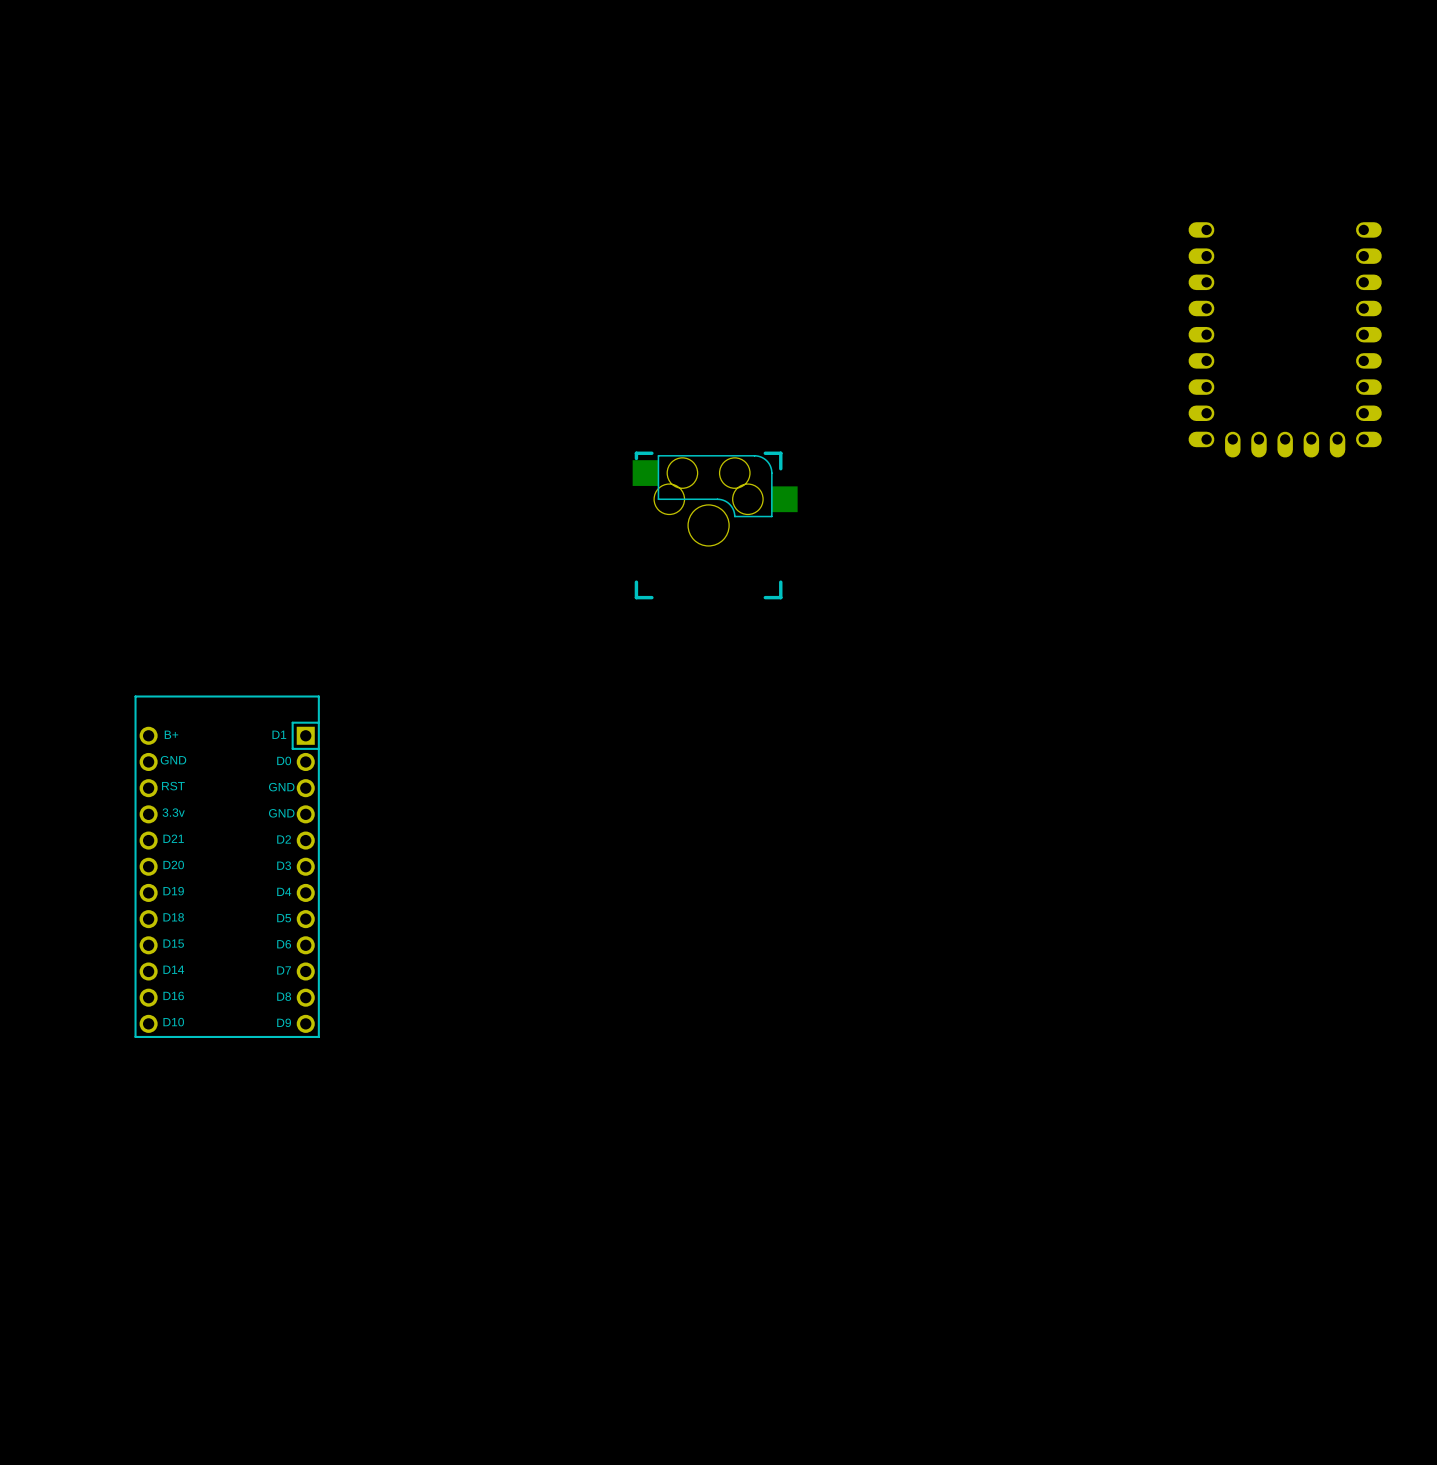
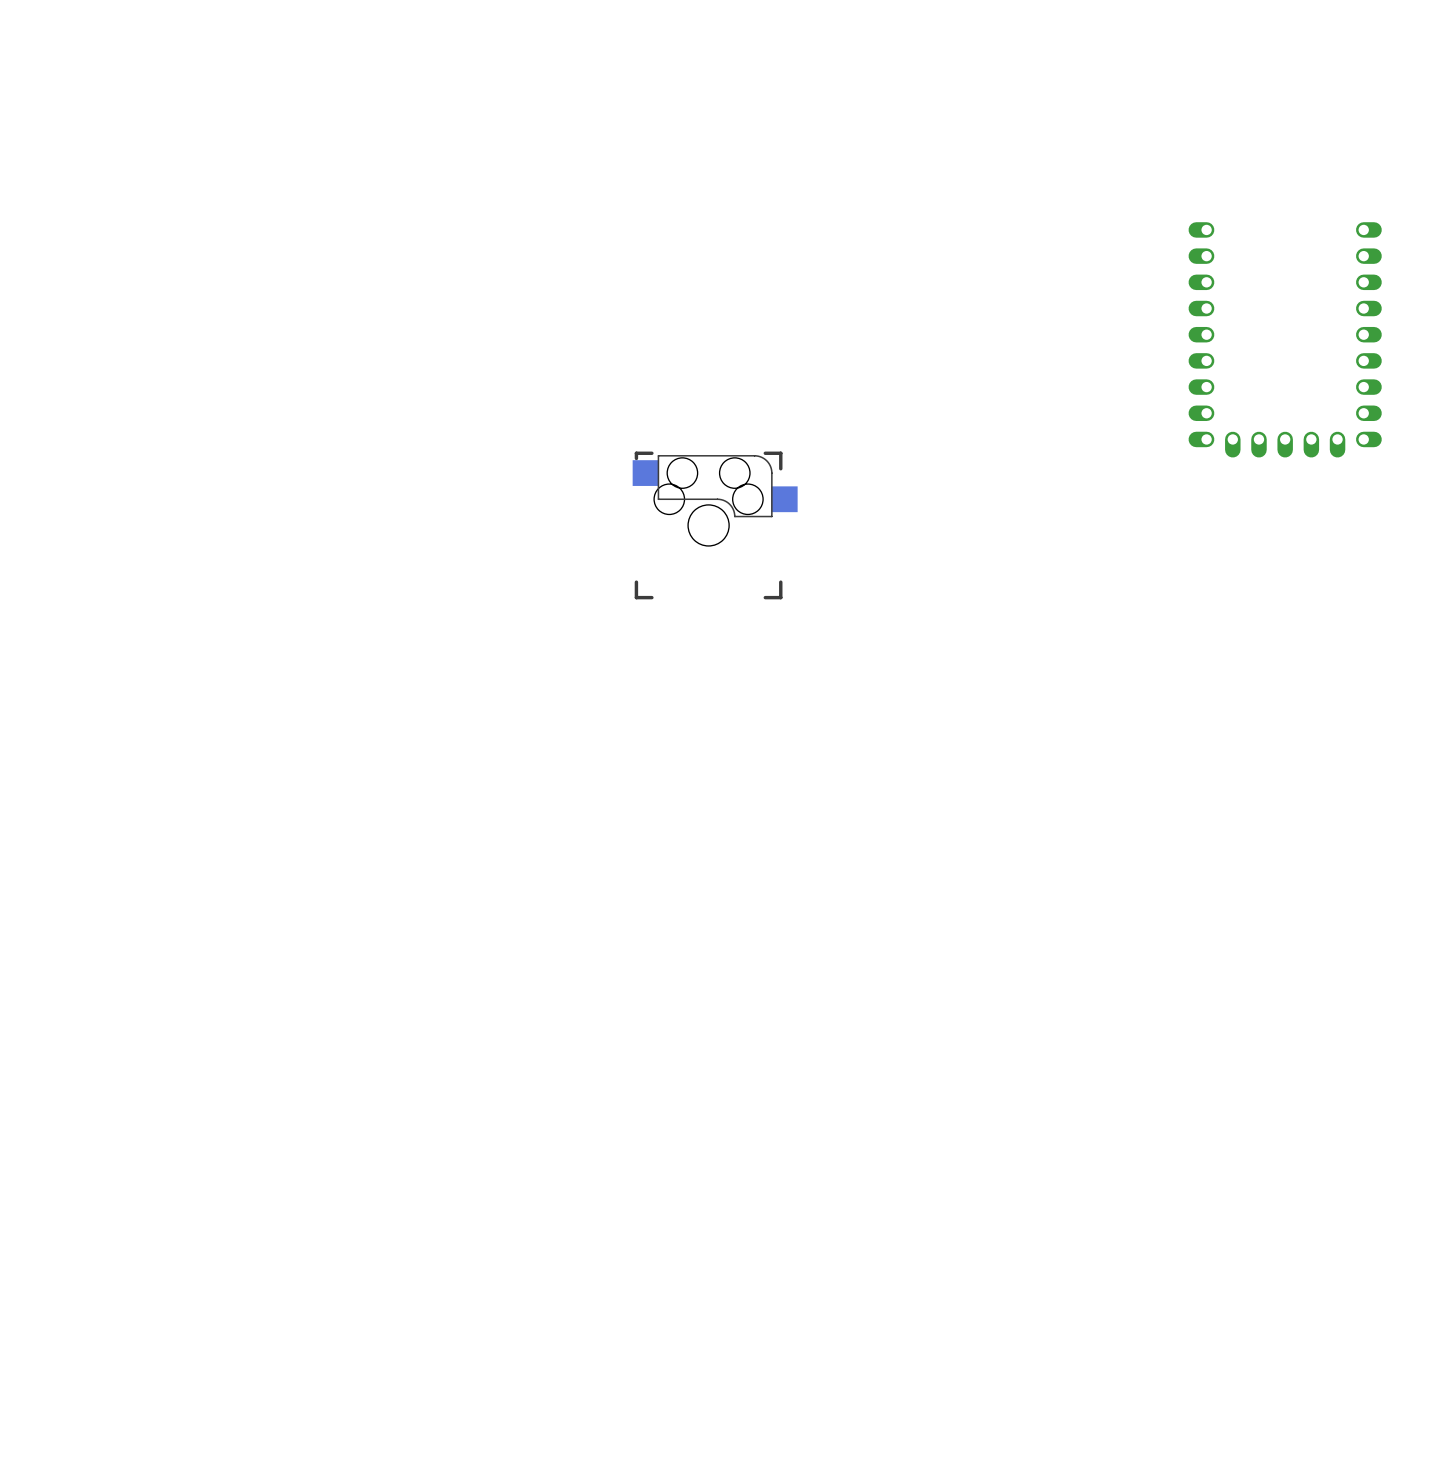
part: (227, 866) -> none

